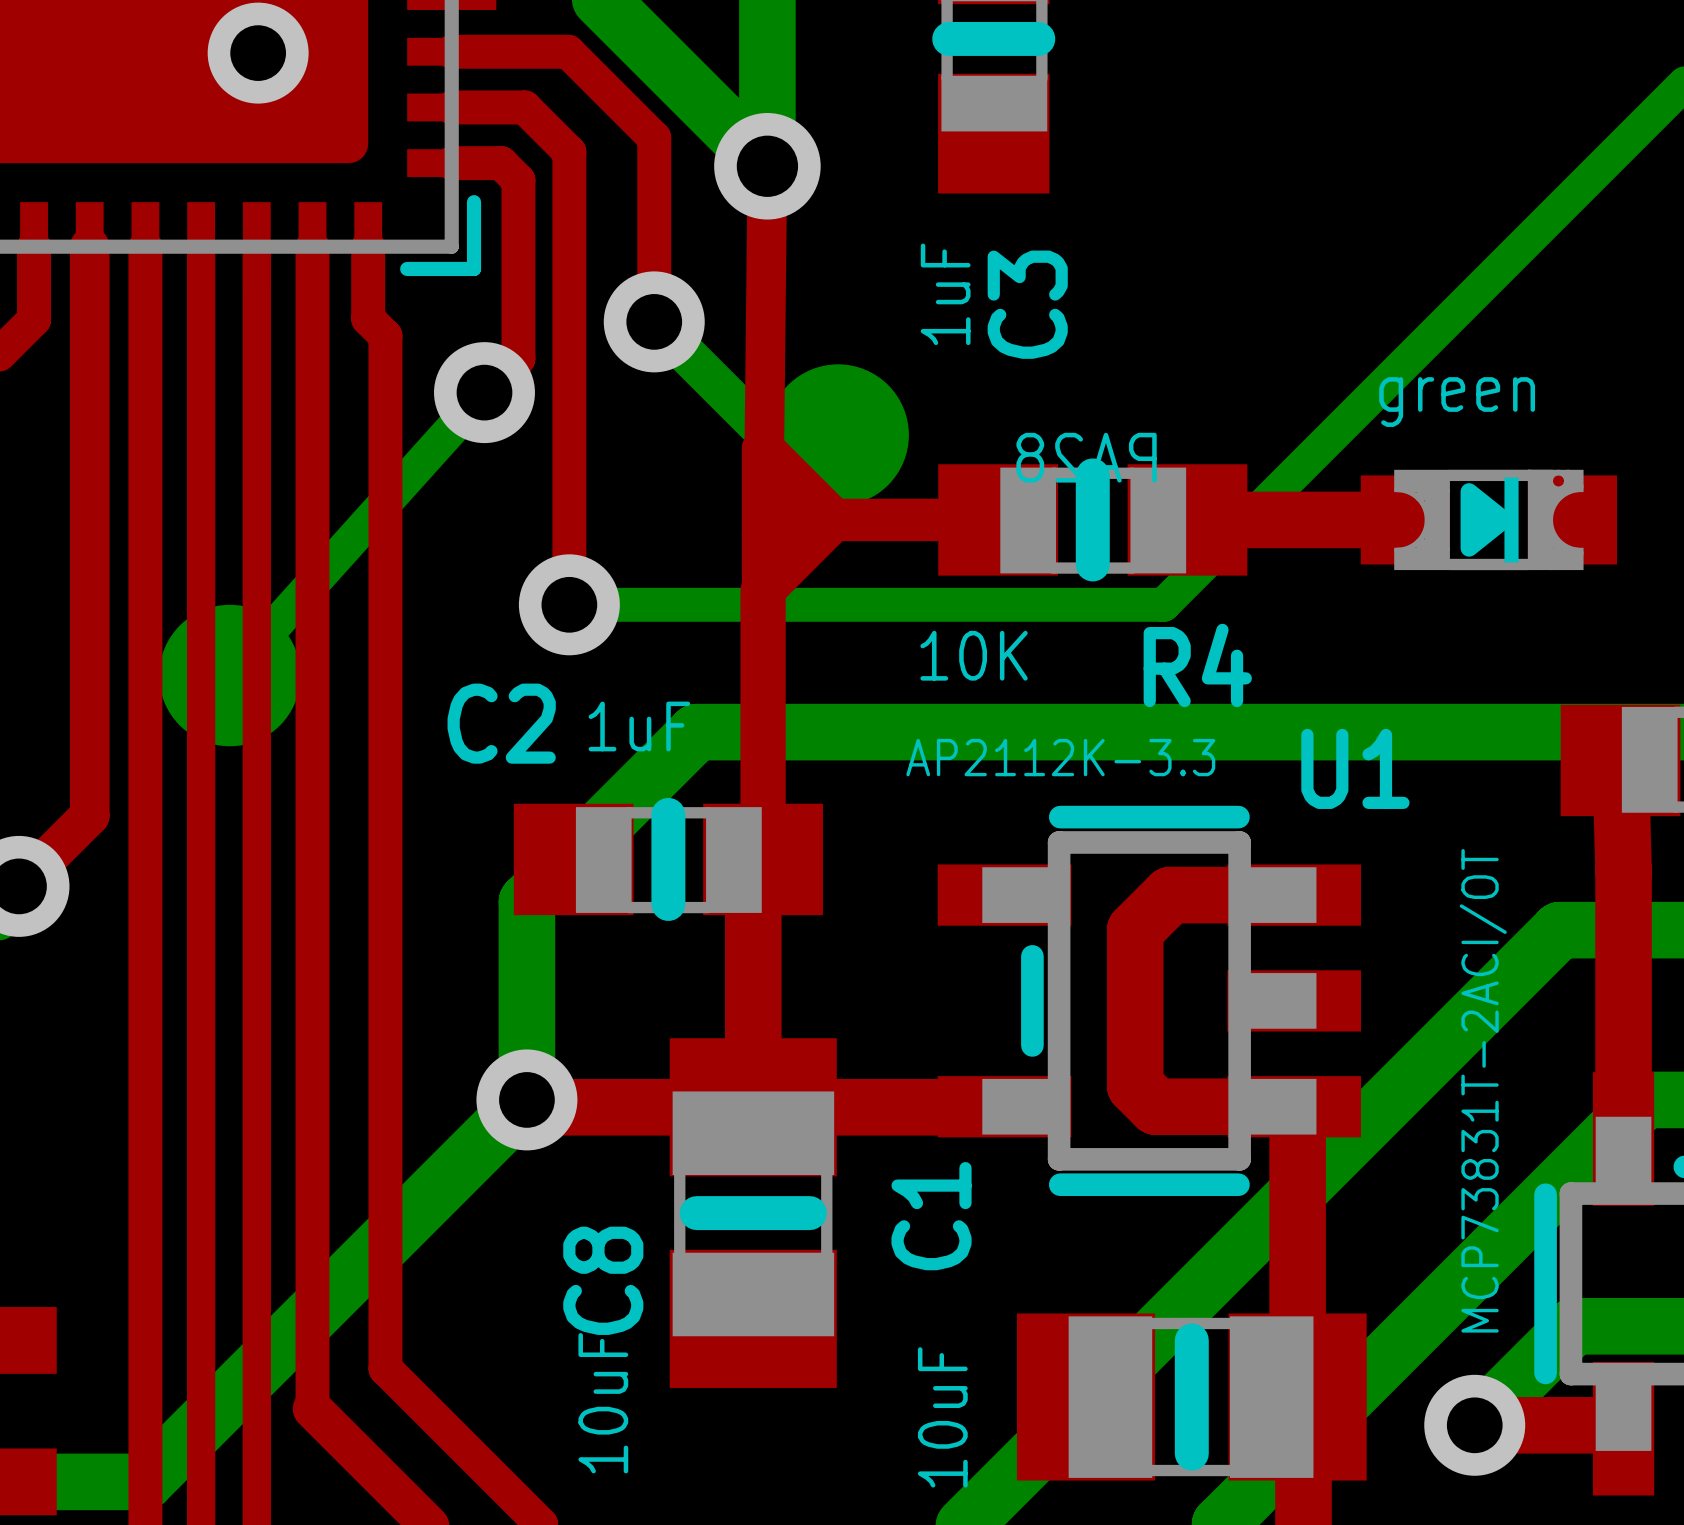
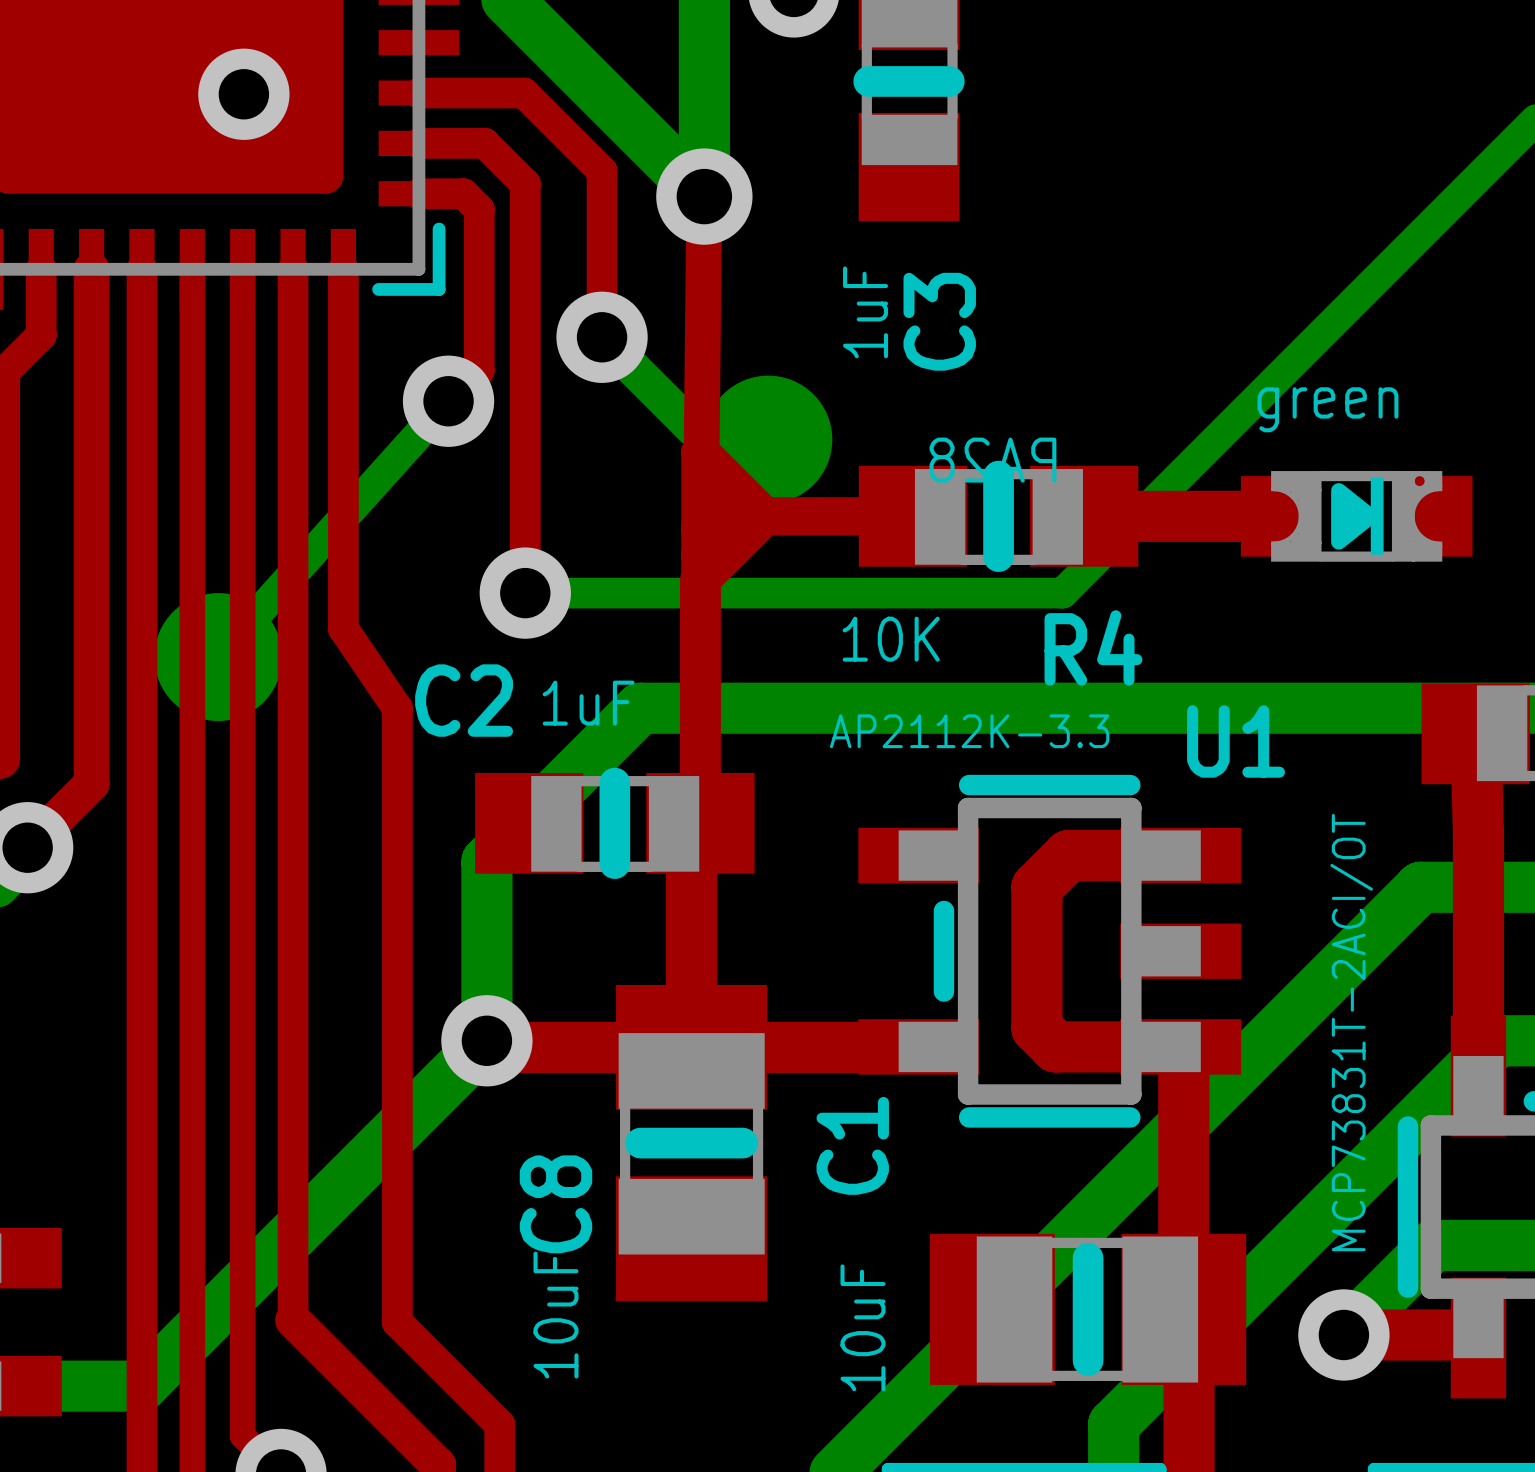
top track: (368, 318) (385, 336) (385, 1368) (427, 1411) -> (343, 334) (343, 628) (397, 708) (397, 1322)

